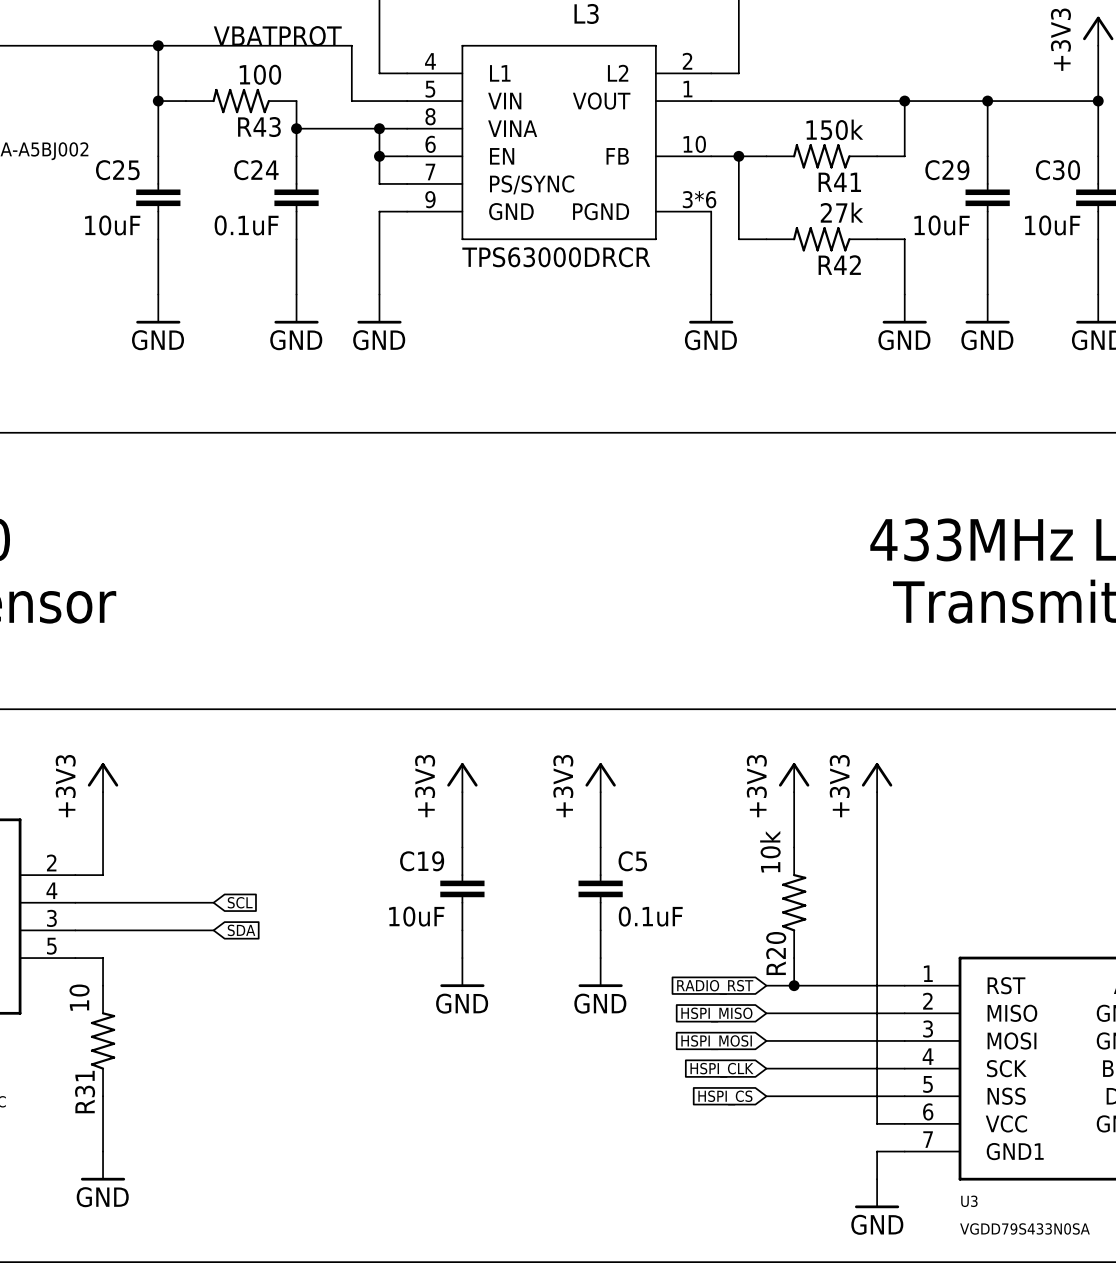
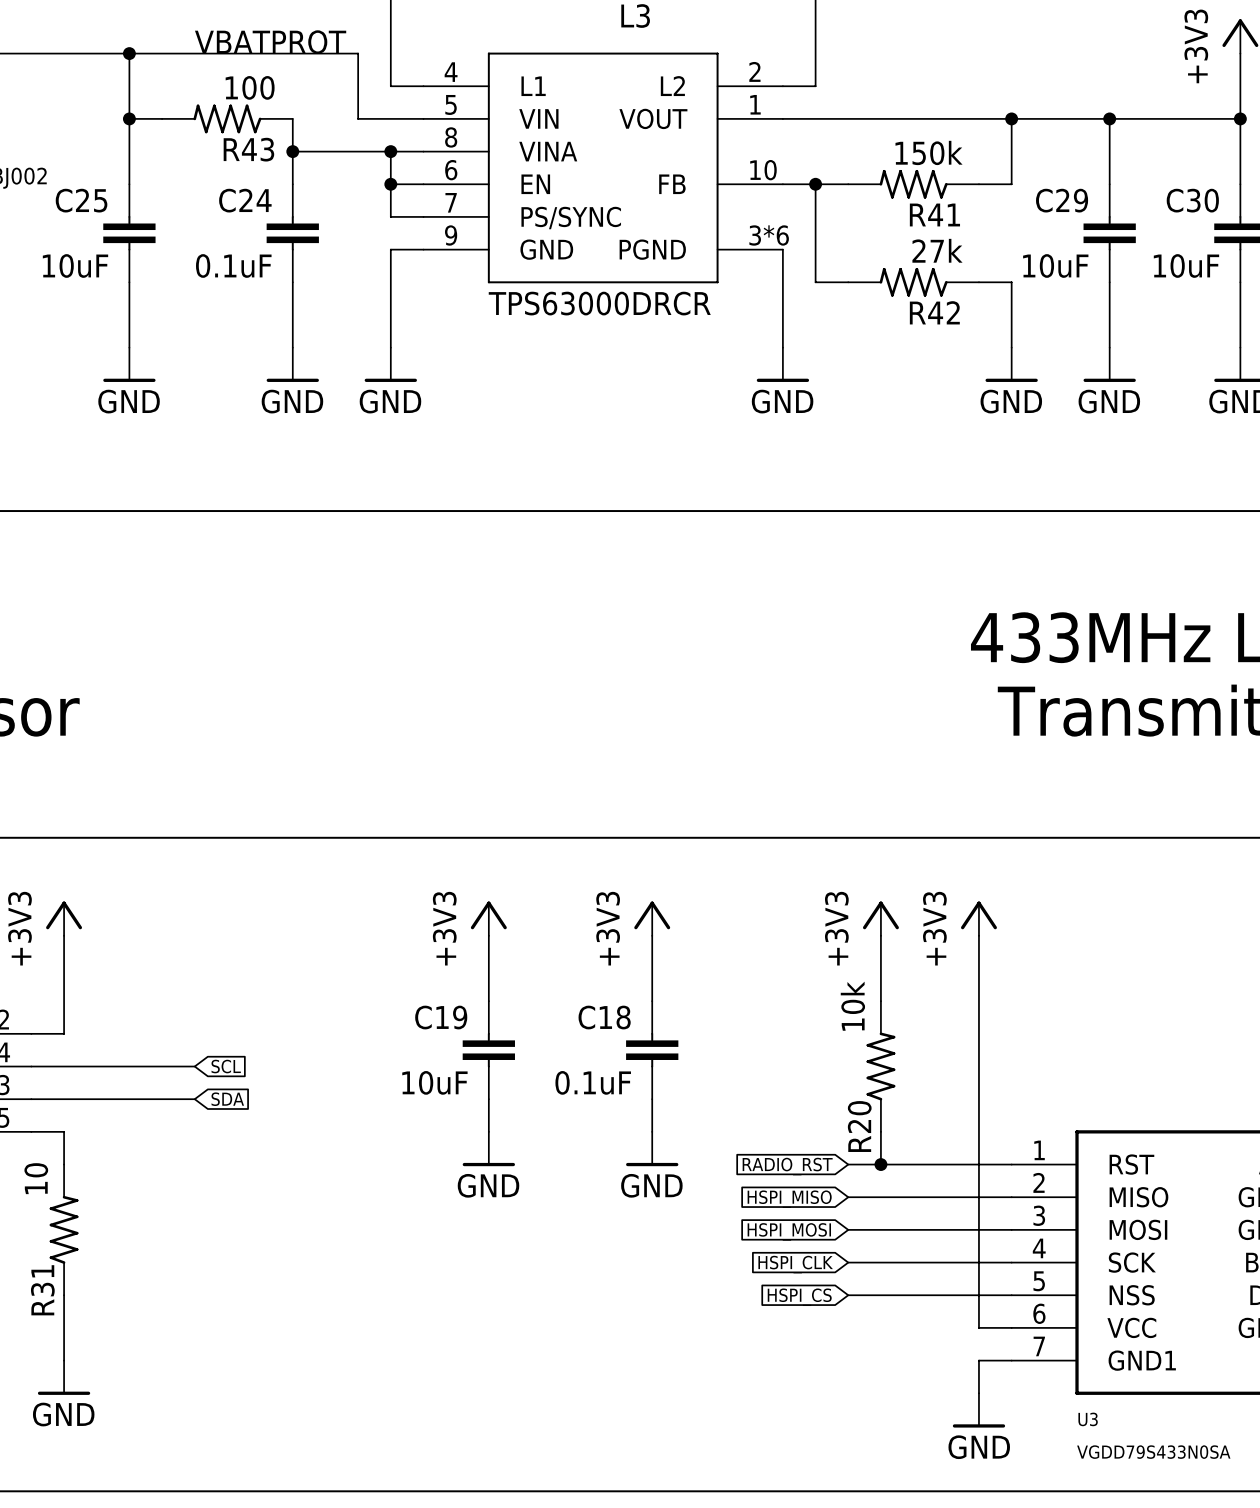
C5 name: C5 (632, 861) -> C18 (604, 1017)
C5 value position: 0.1uF (650, 916) -> 0.1uF (593, 1082)

